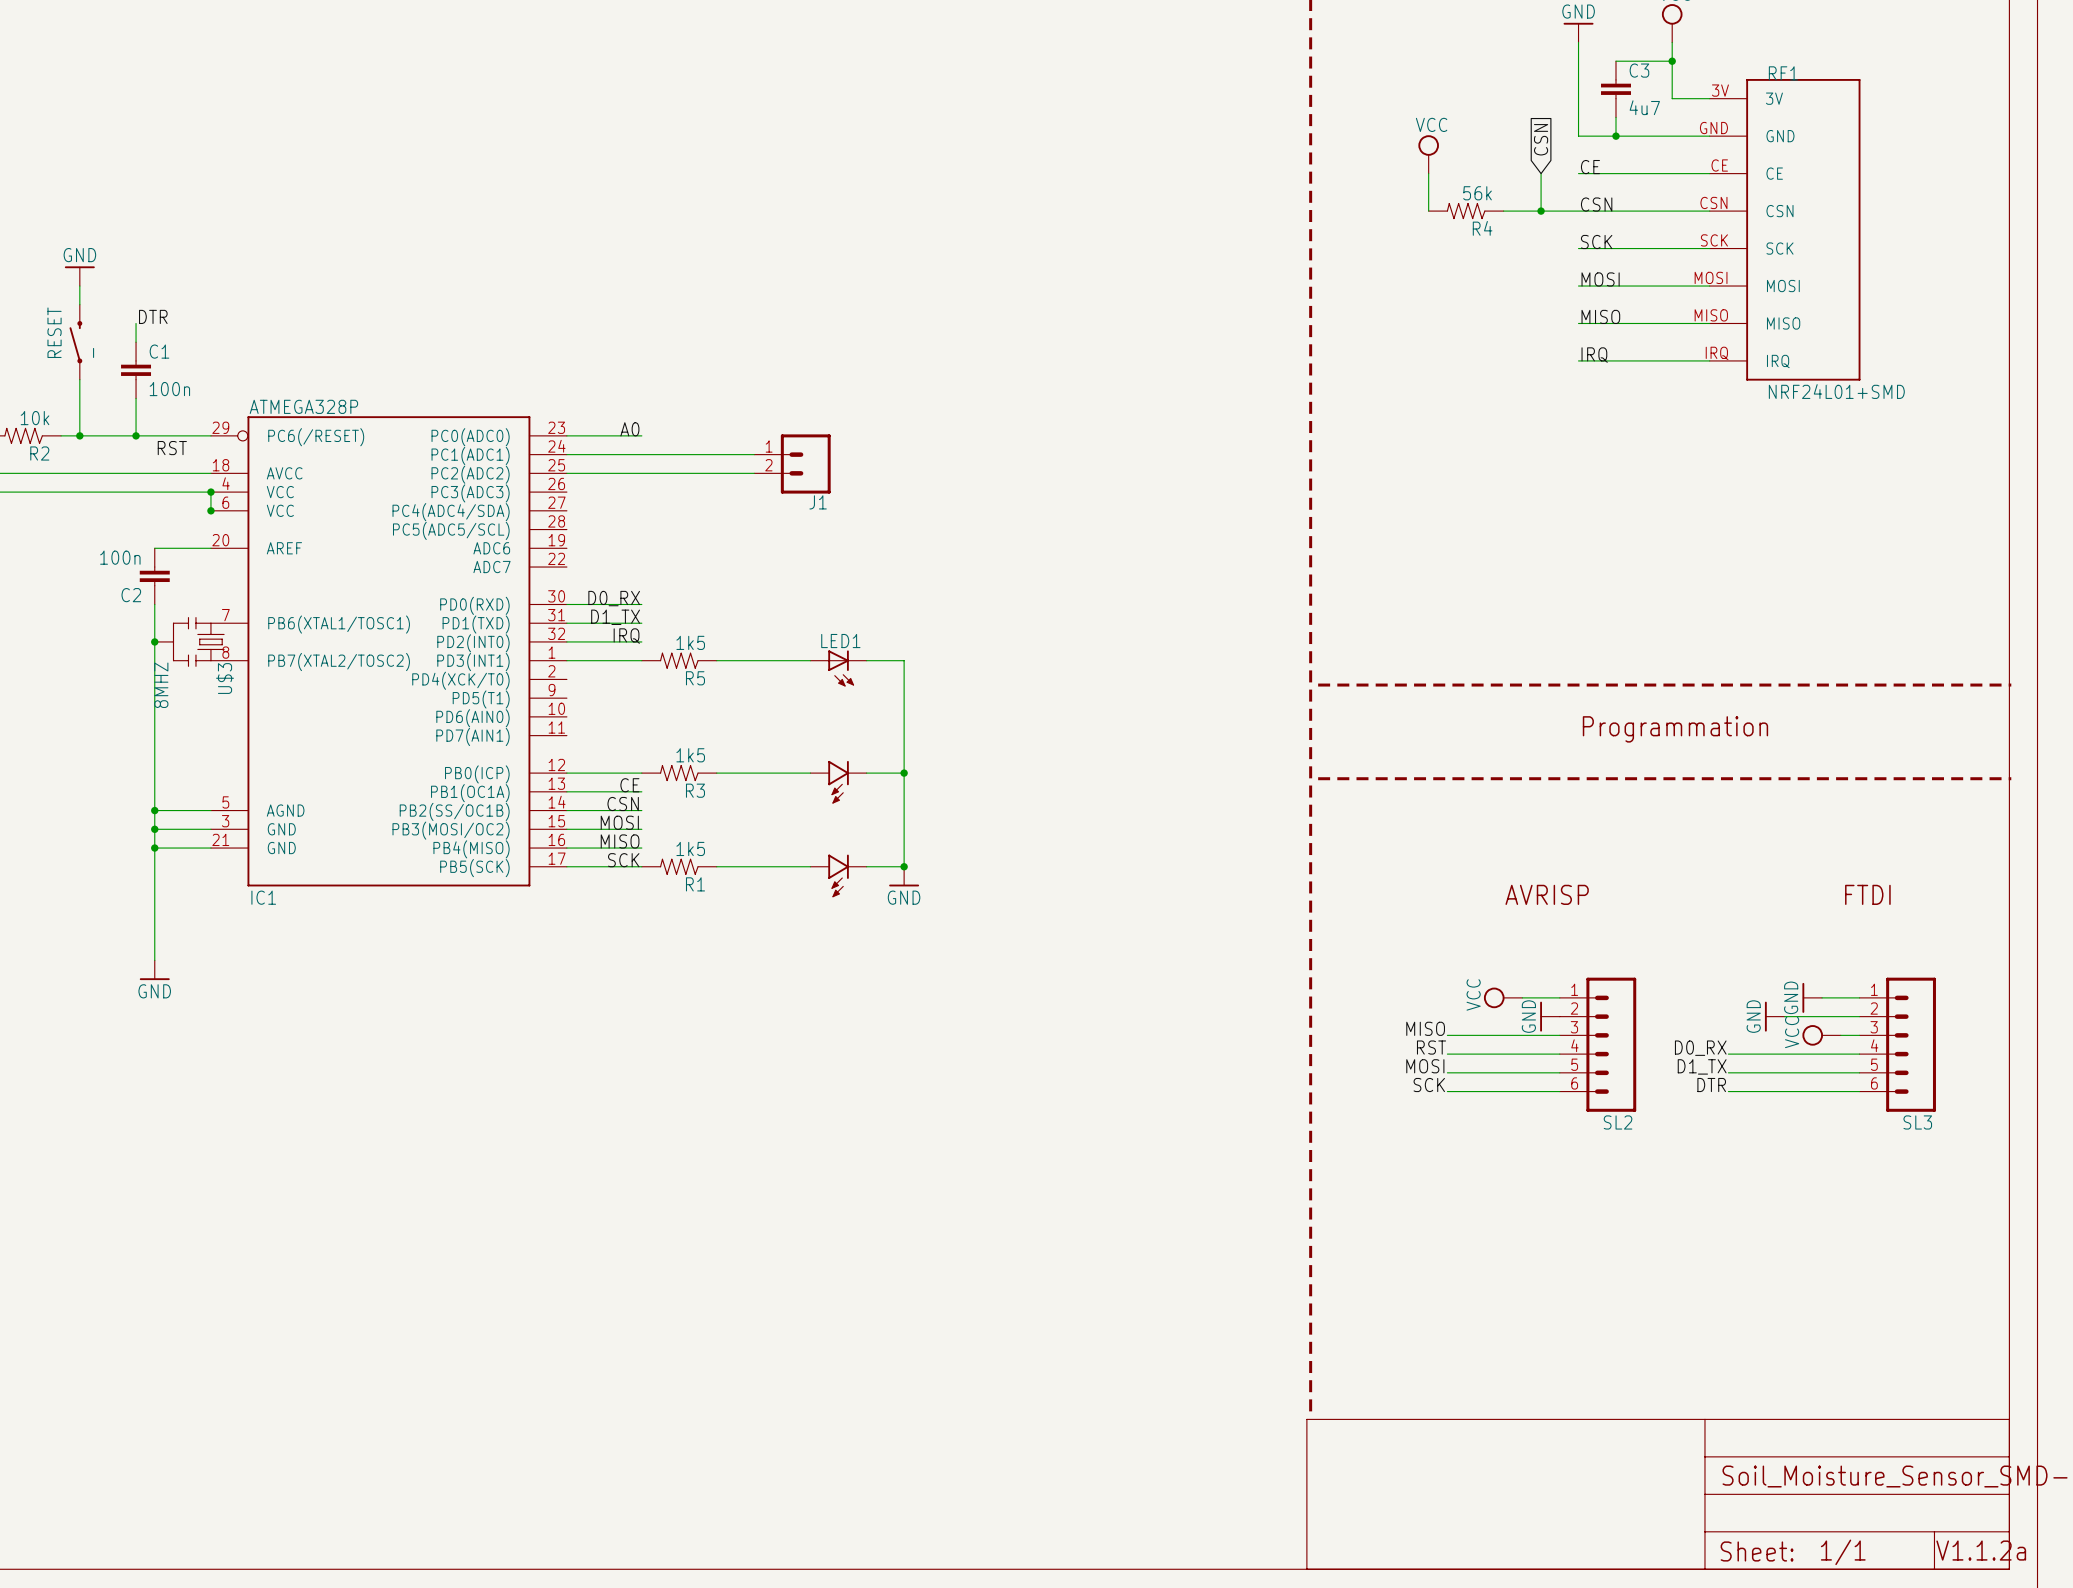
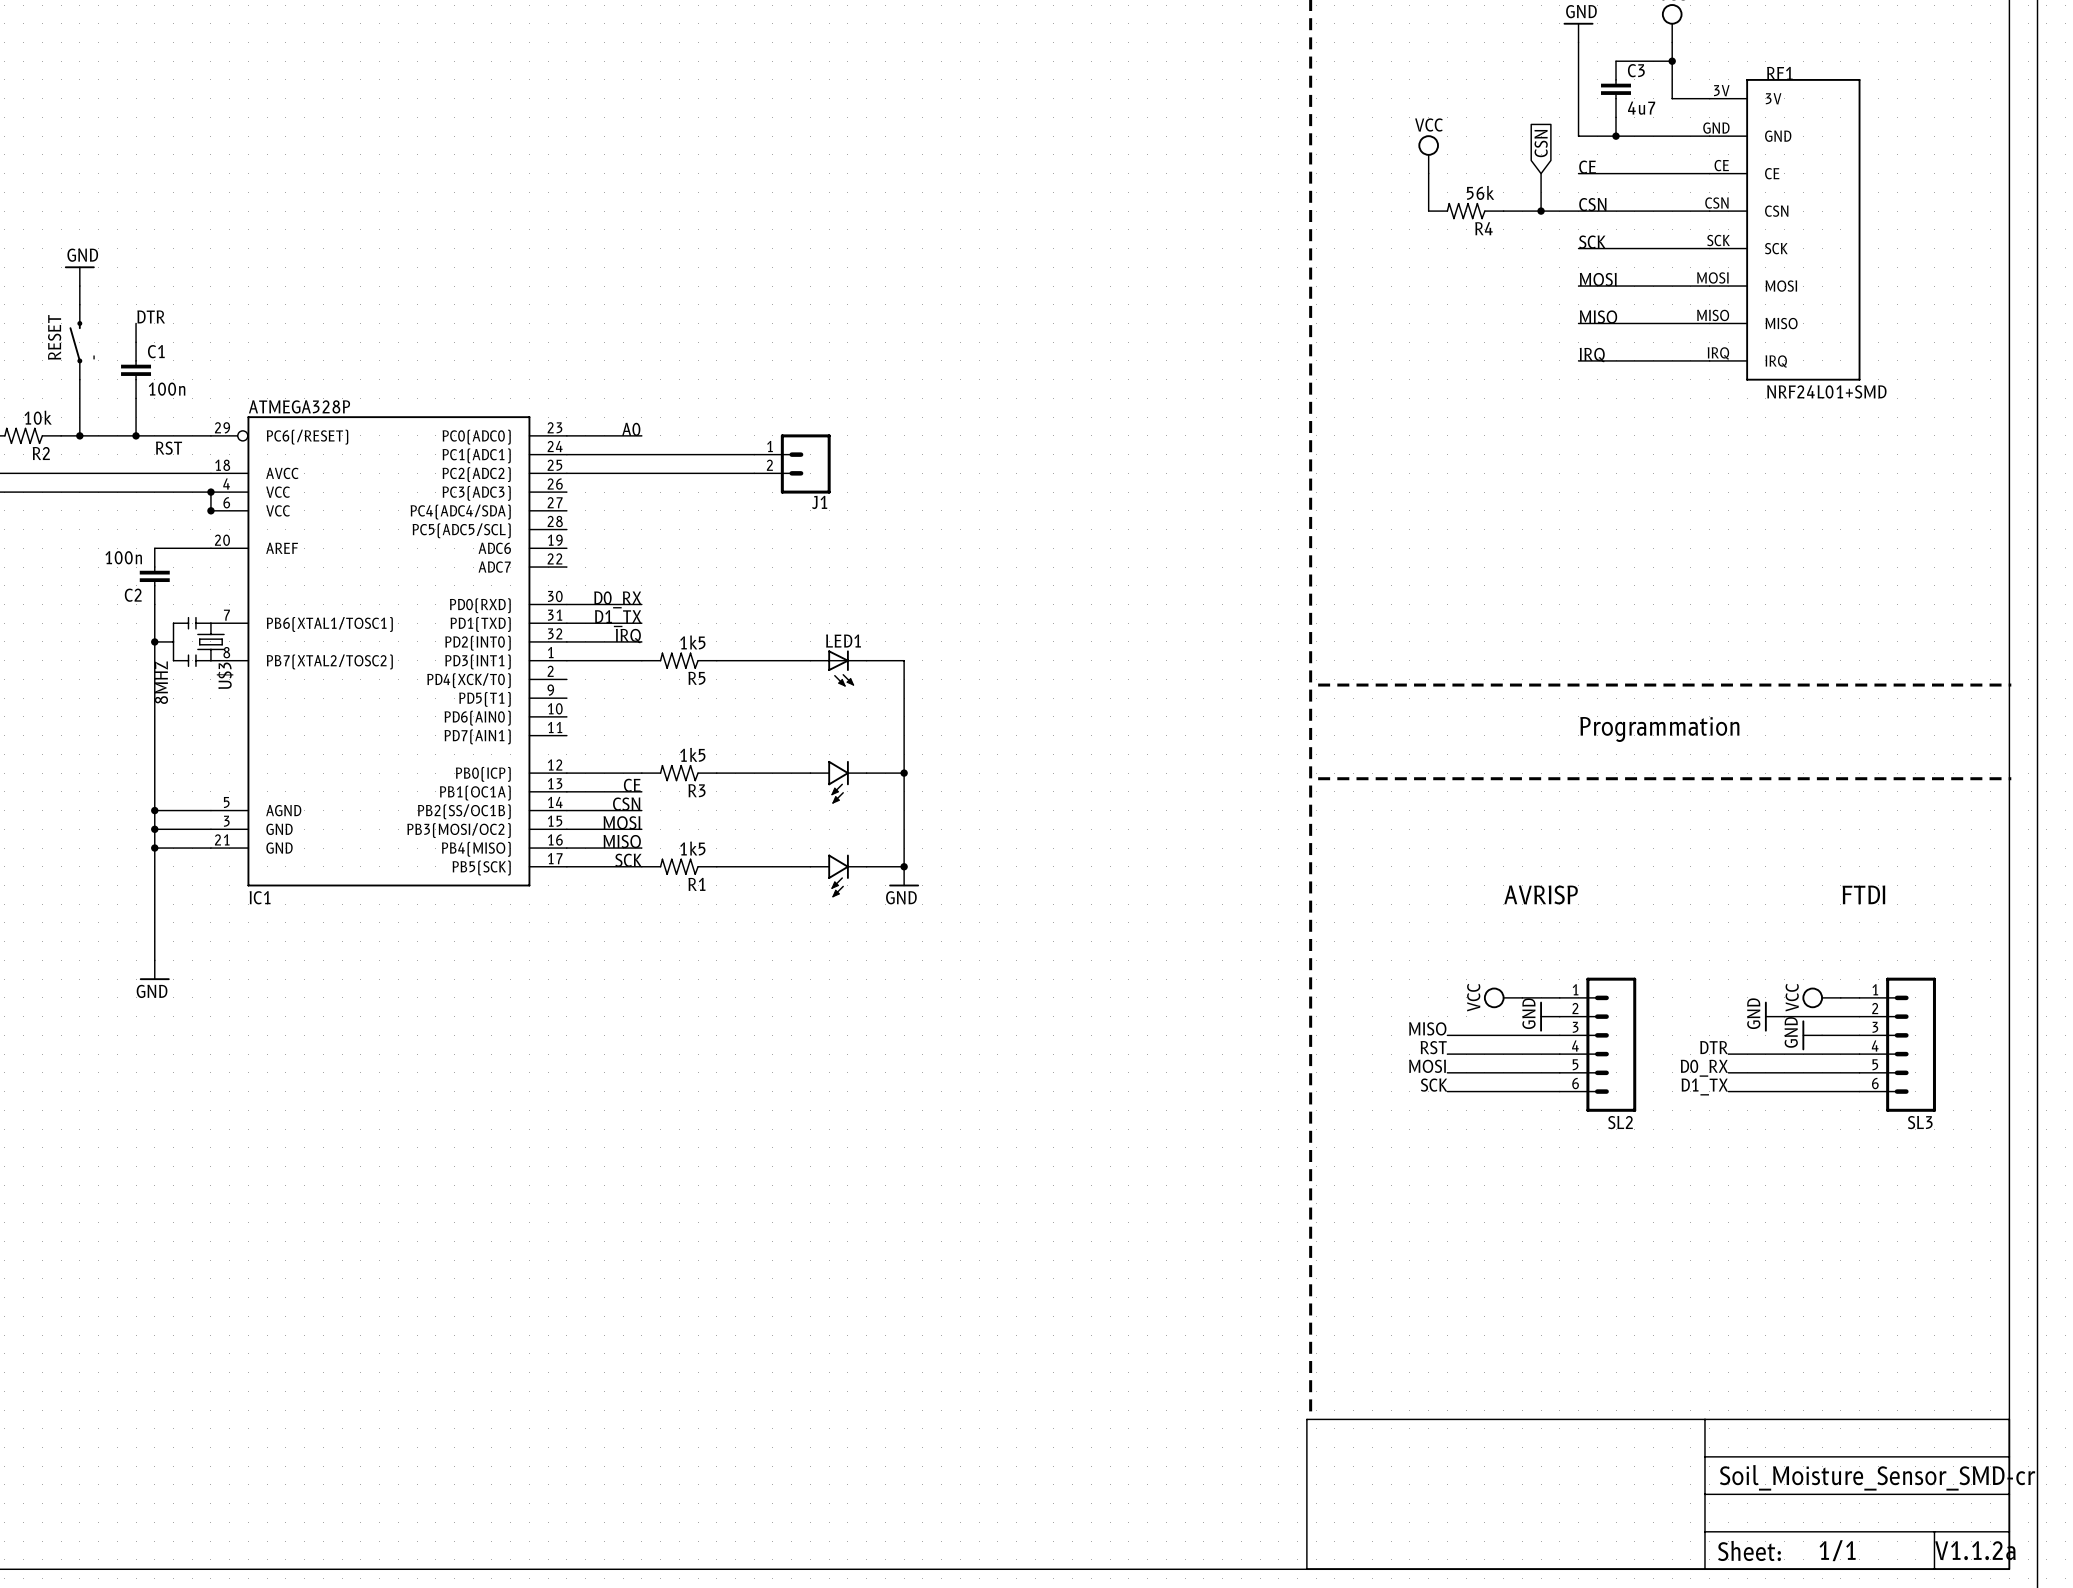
power symbol position: GND (1812, 997) -> GND (1812, 1035)
power symbol position: VCC (1821, 1035) -> VCC (1821, 997)
label: D0_RX (1700, 1048) -> DTR (1714, 1047)
label: D1_TX (1702, 1066) -> D0_RX (1704, 1068)
label: DTR (1711, 1085) -> D1_TX (1704, 1086)

